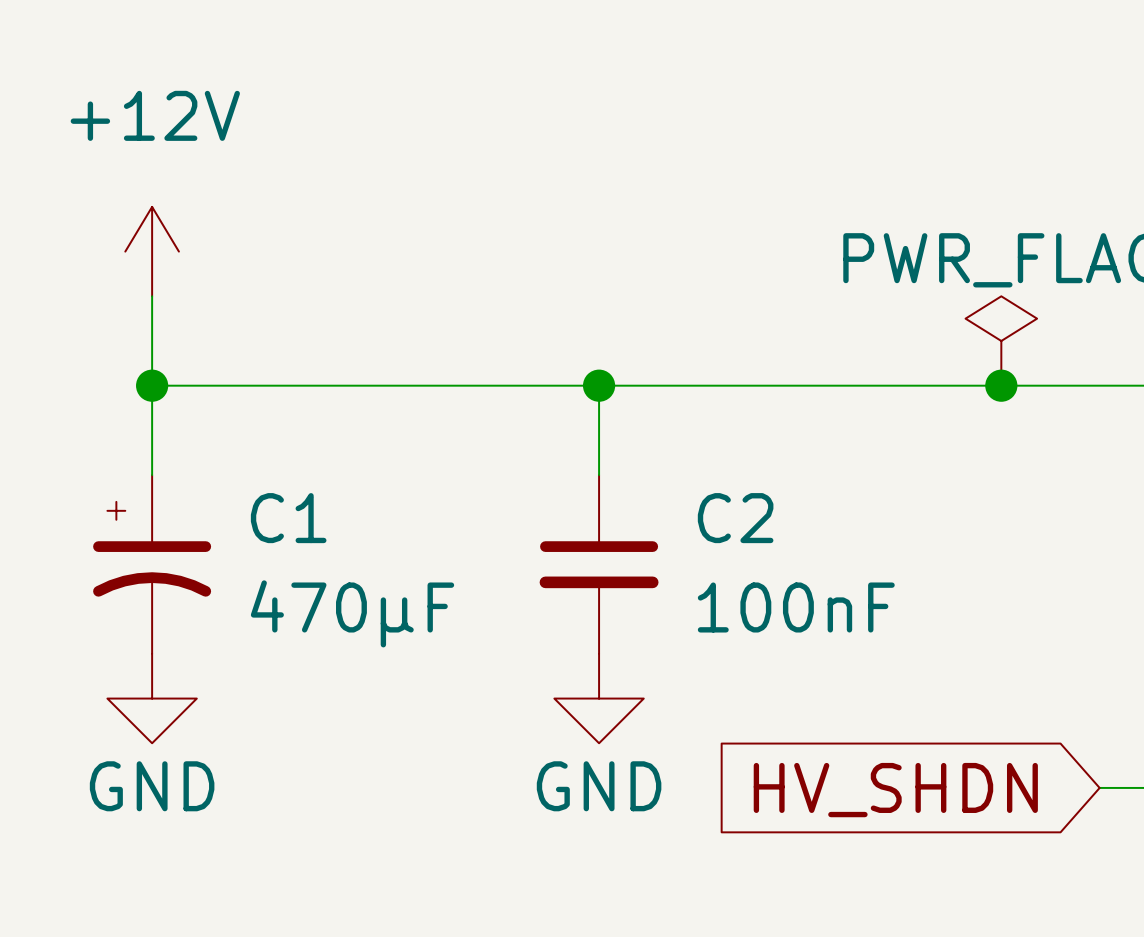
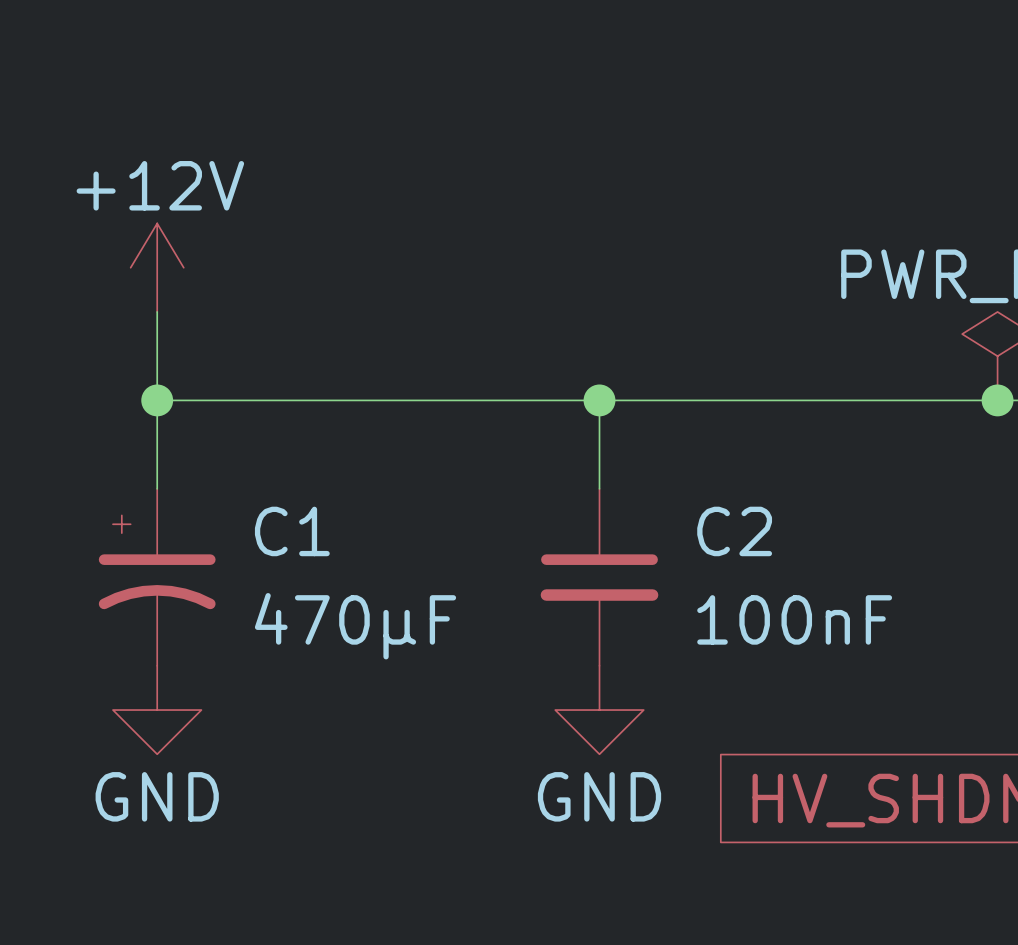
power symbol text position: +12V (155, 115) -> +12V (160, 185)

